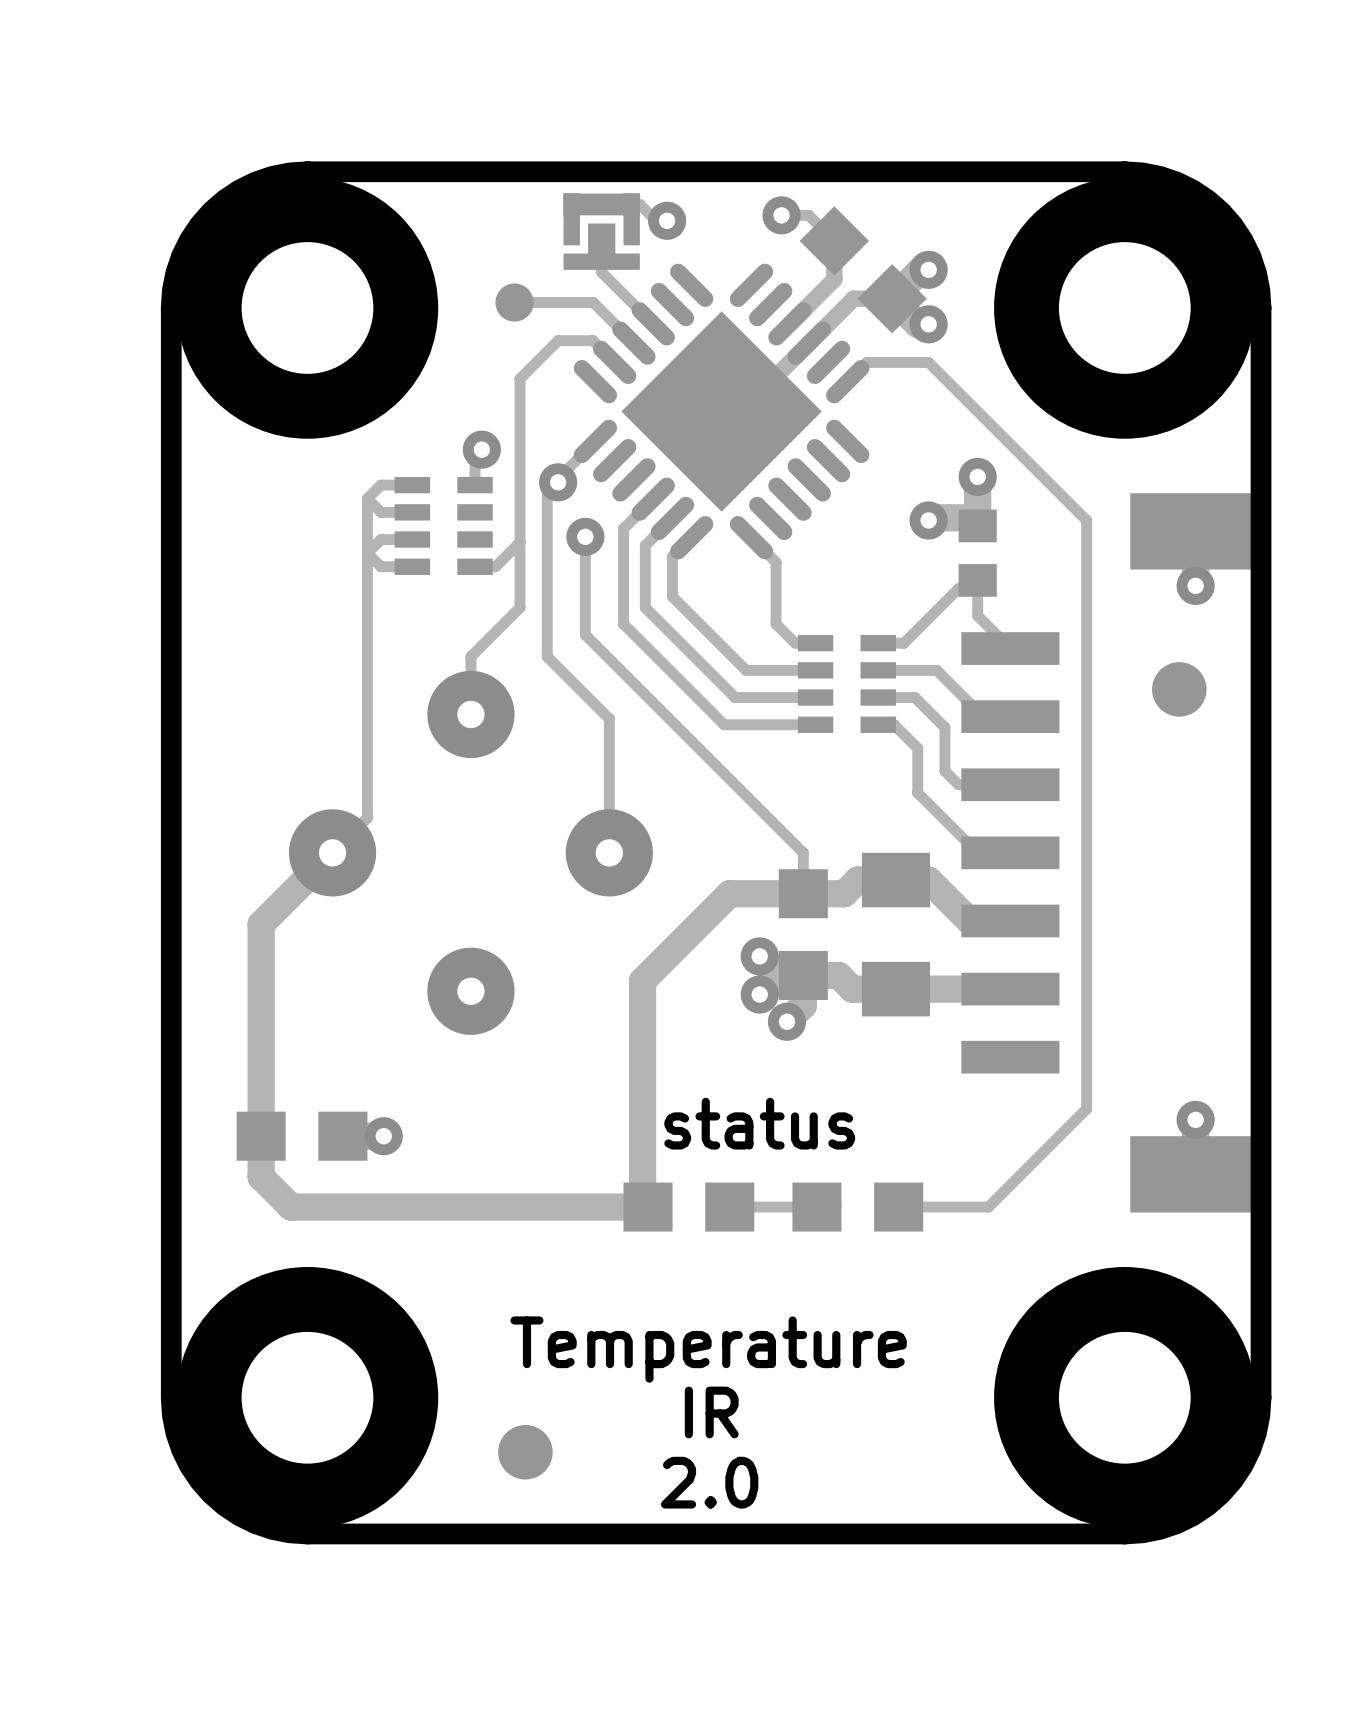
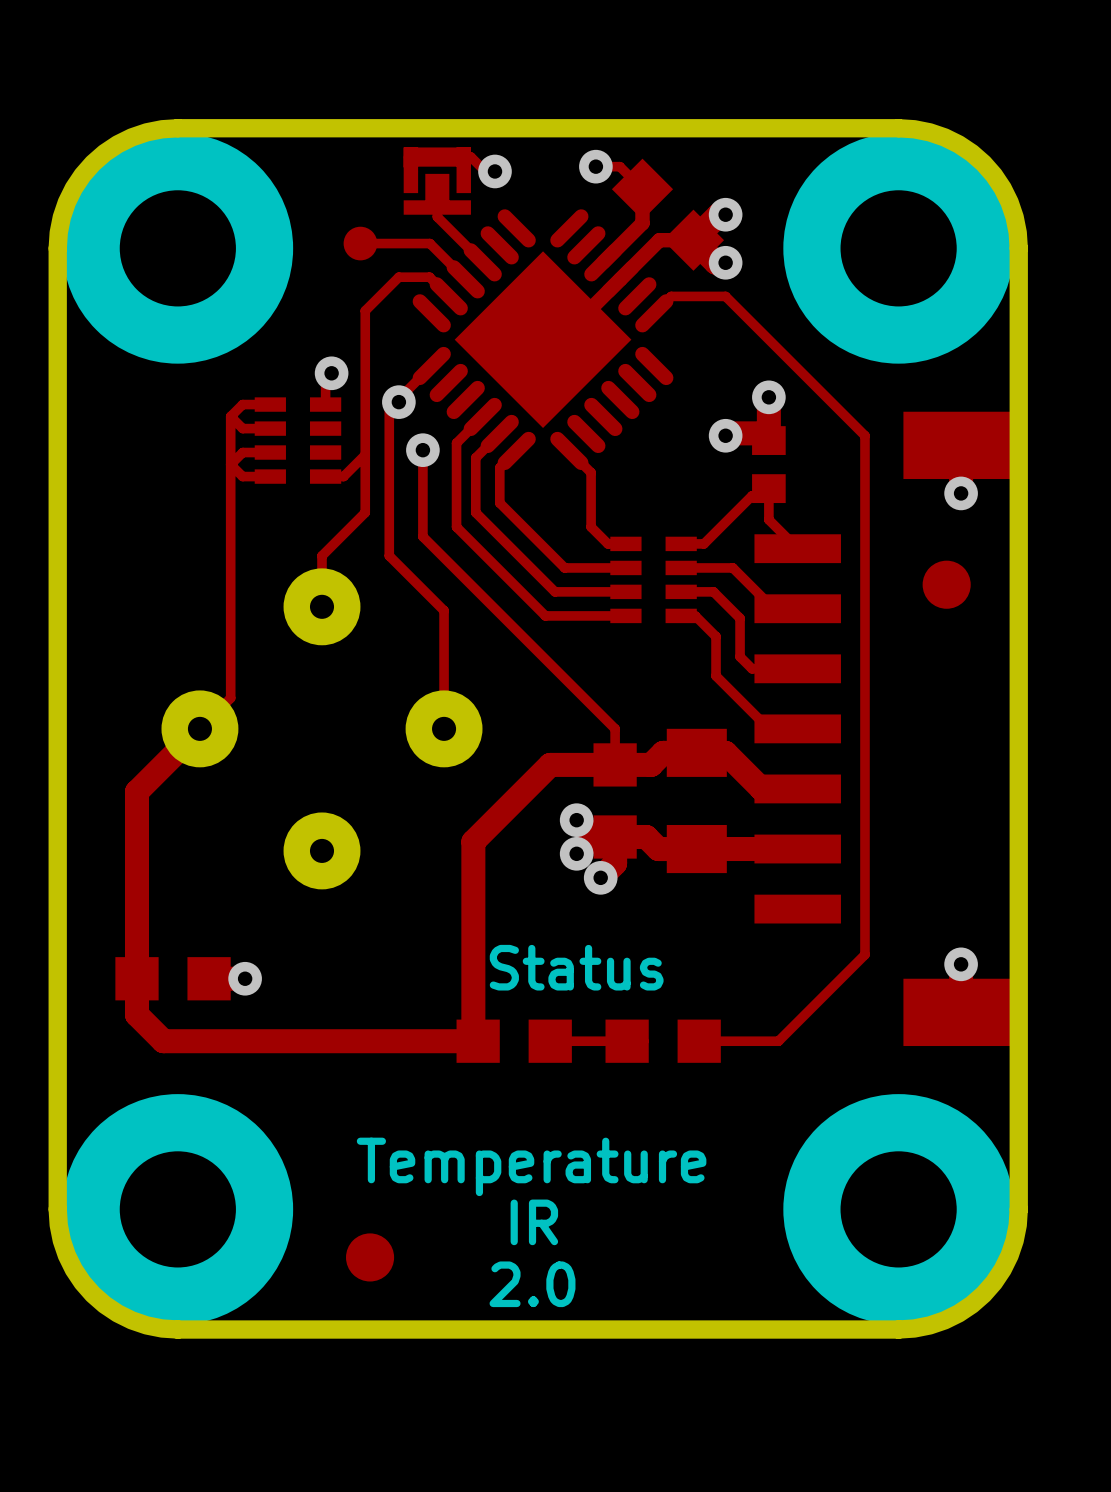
text: status (759, 1123) -> Status (576, 967)

